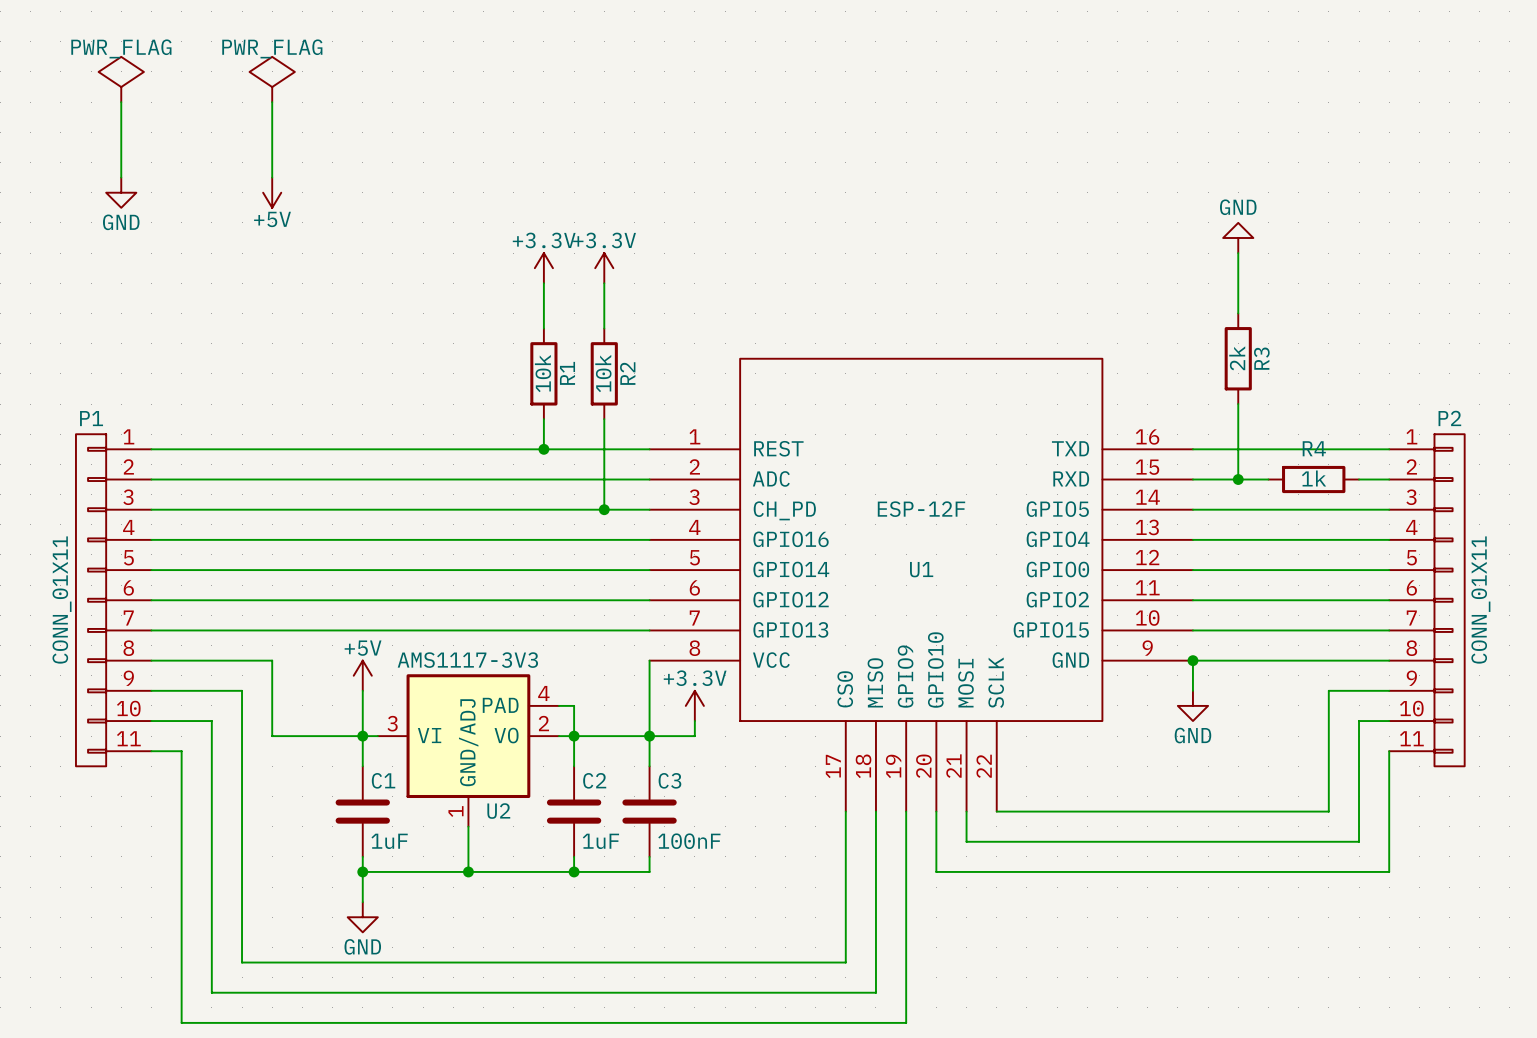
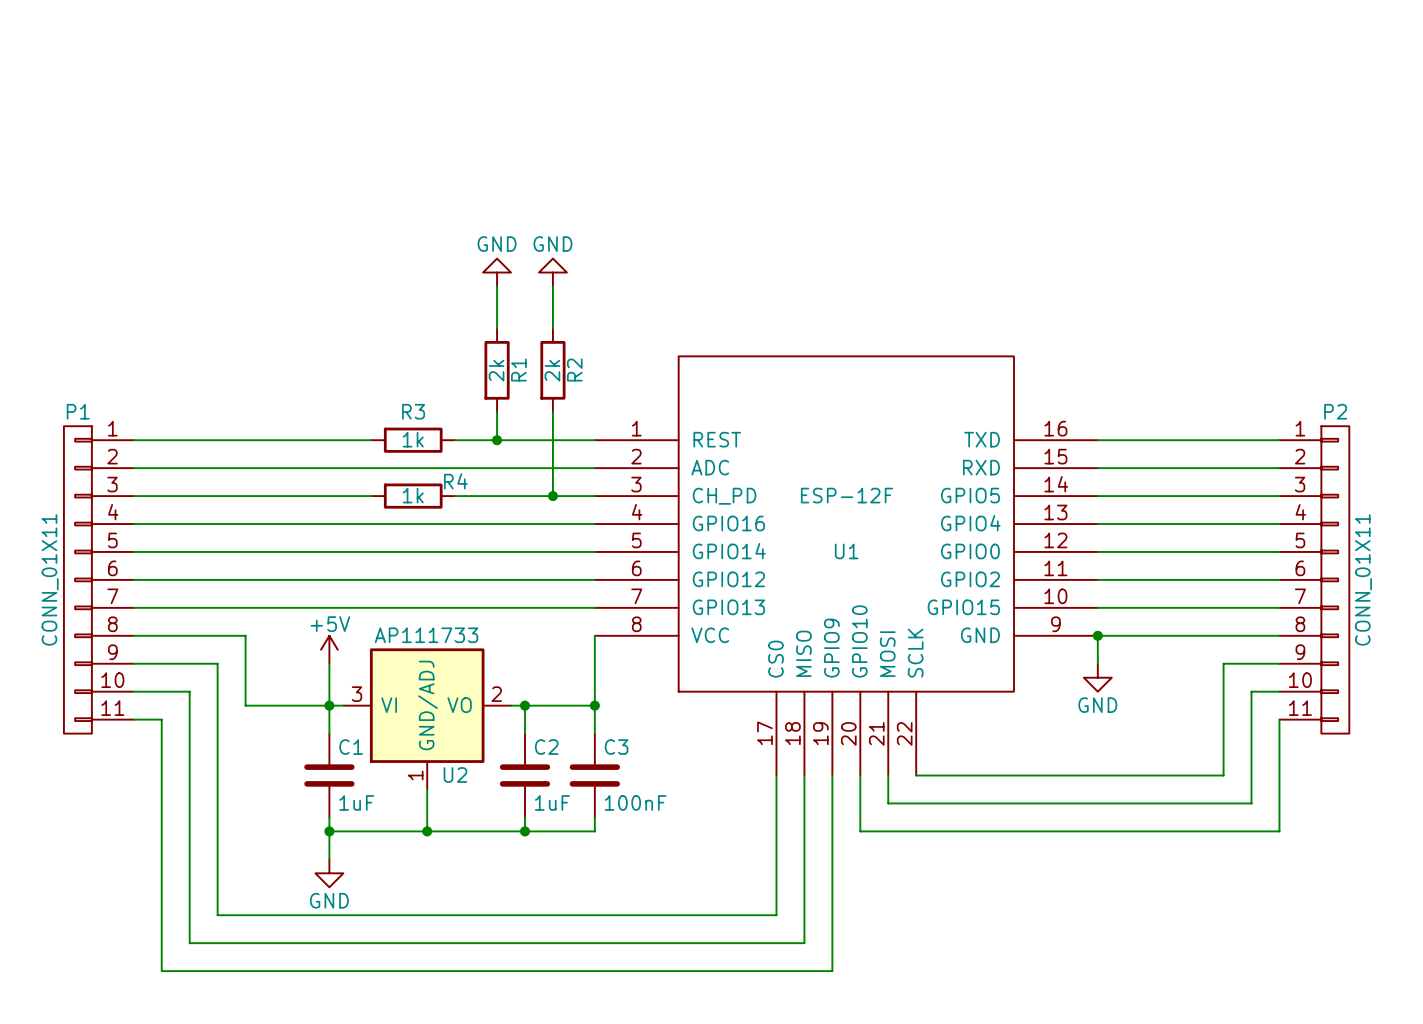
power symbol: PWR_FLAG (121, 79) -> none
power symbol: PWR_FLAG (272, 79) -> none
wire: (121, 102) (121, 177) -> none
wire: (272, 102) (272, 177) -> none
power symbol: GND (121, 192) -> none
power symbol: +5V (272, 192) -> none
power symbol: GND (1238, 238) -> none
wire: (1238, 253) (1238, 313) -> none
power symbol: +3.3V (543, 268) -> GND (497, 272)
power symbol: +3.3V (604, 268) -> GND (552, 272)
R3 value: 2k (1237, 358) -> 1k (413, 439)
R3 rotation: 0° (1238, 358) -> 90° clockwise (413, 440)
R3 position: (1238, 358) -> (413, 440)
R3 name position: R3 (1261, 358) -> R3 (413, 411)
R1 value: 10k (543, 373) -> 2k (496, 370)
R2 value: 10k (603, 373) -> 2k (552, 370)
wire: (1238, 404) (1238, 479) -> none
R4 name position: R4 (1314, 448) -> R4 (455, 481)
wire: (408, 449) (498, 449) -> none
junction: (1238, 479) -> none
wire: none -> (1167, 468) (1251, 468)
R4 position: (1313, 479) -> (413, 496)
wire: (408, 509) (498, 509) -> none
U2 value: AMS1117-3V3 (467, 660) -> AP111733 (426, 635)
U2 symbol: [377, 674, 560, 827] -> [343, 648, 512, 790]
wire: (559, 705) (574, 705) (574, 736) -> none
power symbol: +3.3V (694, 705) -> none
wire: (694, 721) (694, 736) (649, 736) -> none

